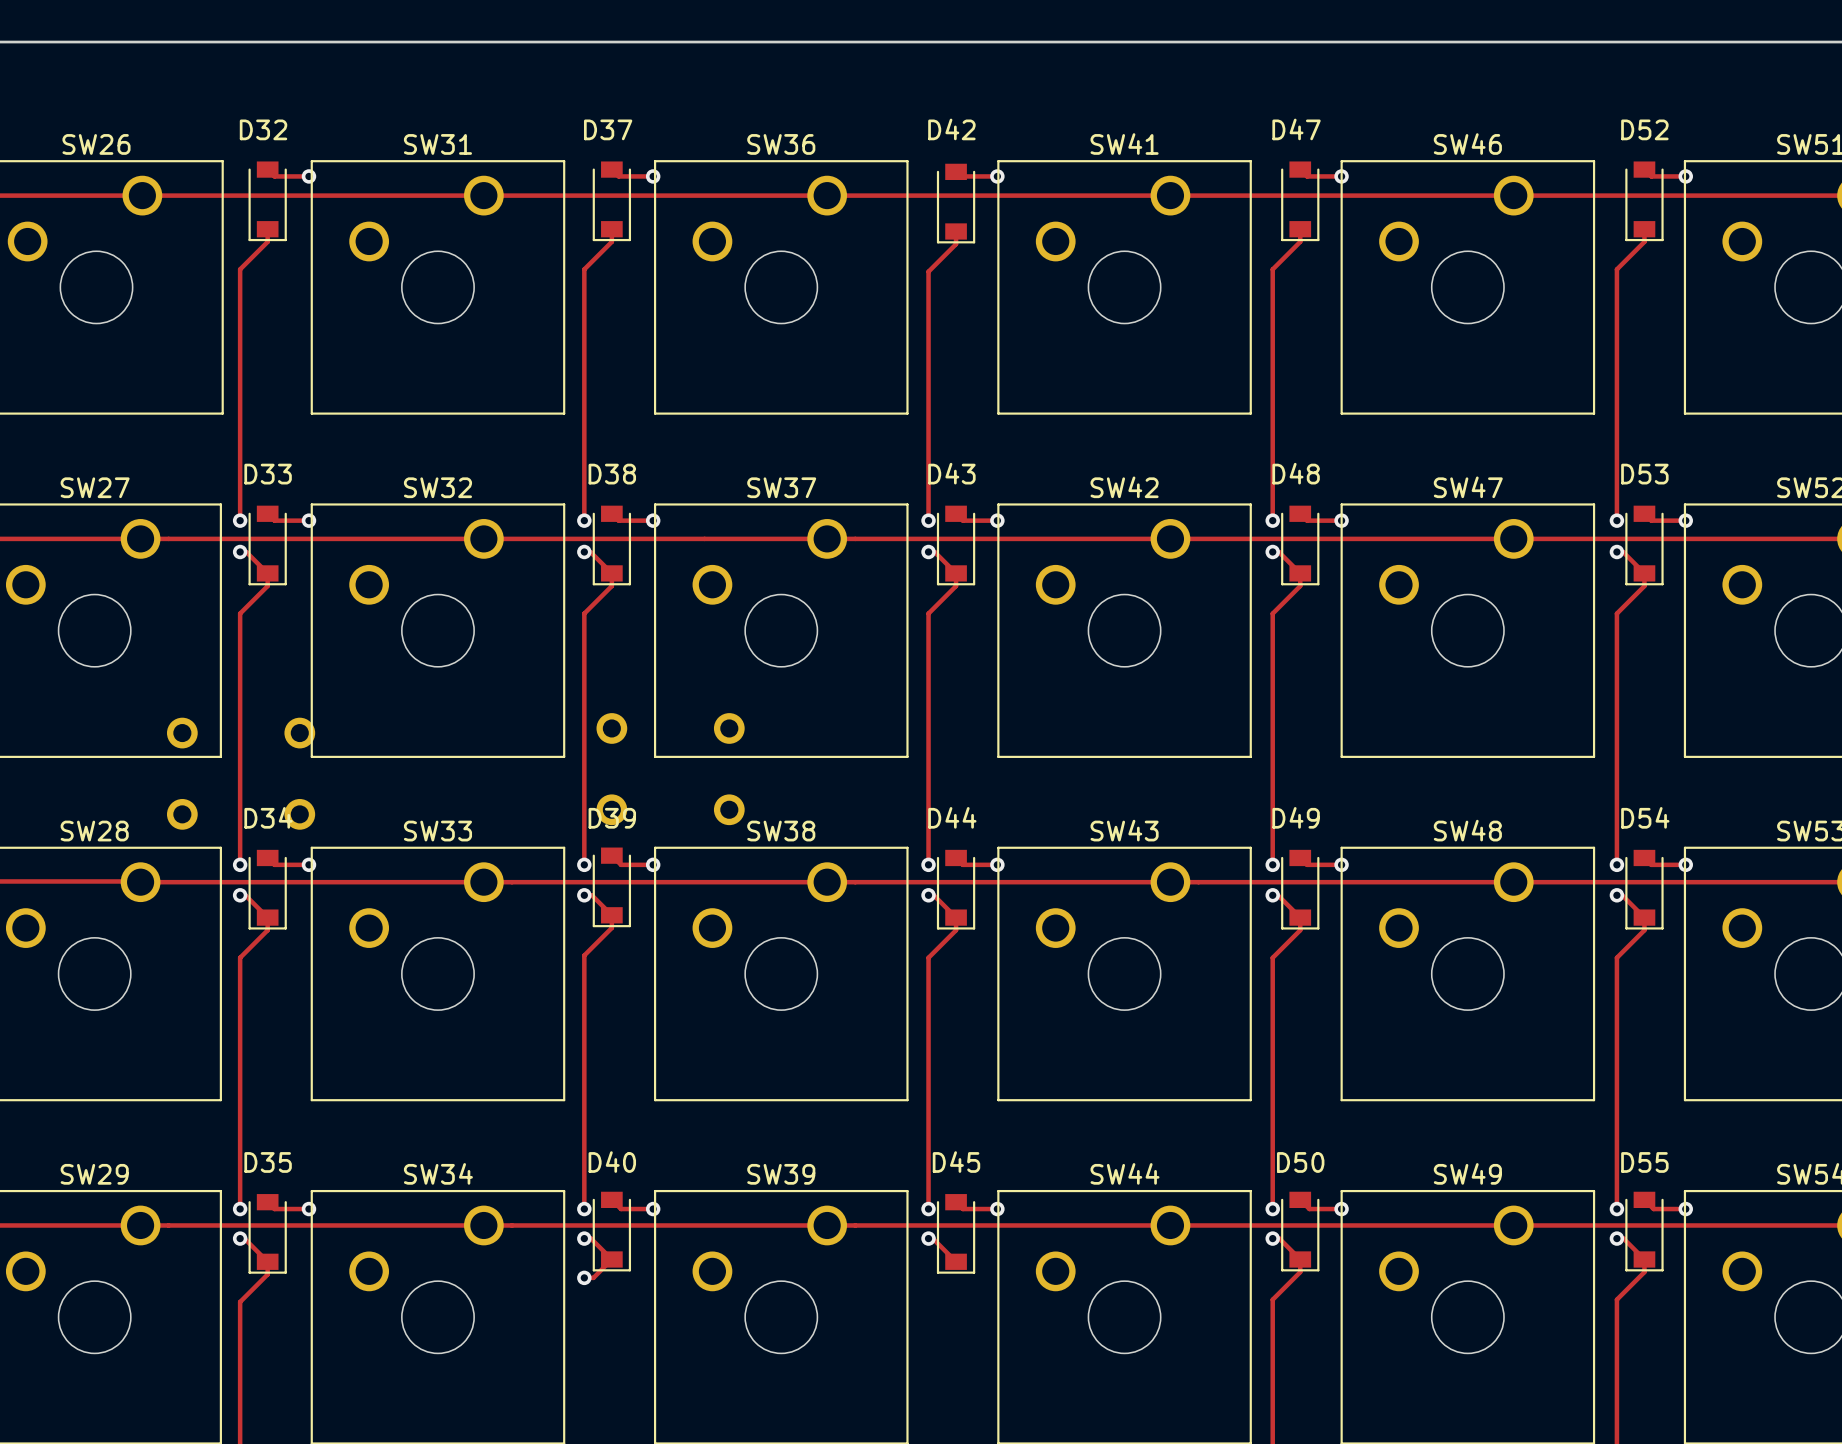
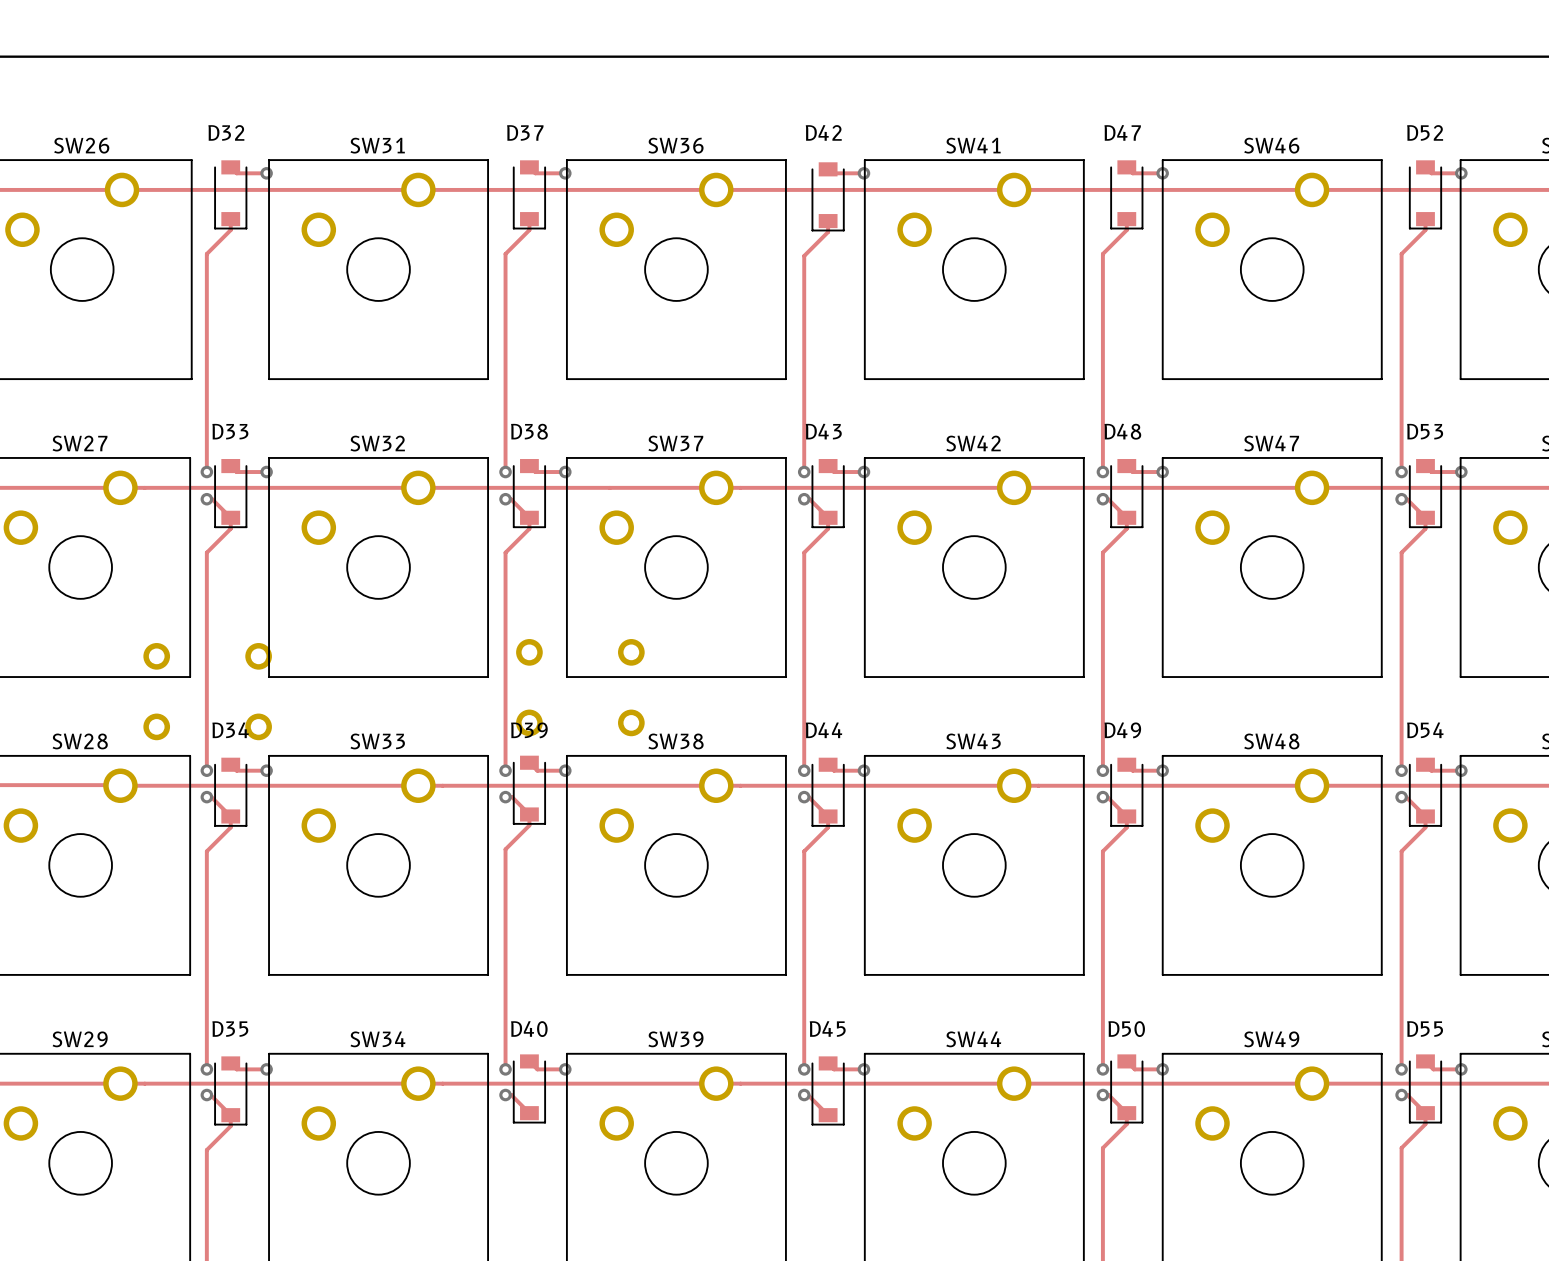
track: (611, 1259) (593, 1277) (584, 1277) -> none
via: (584, 1277) -> none

